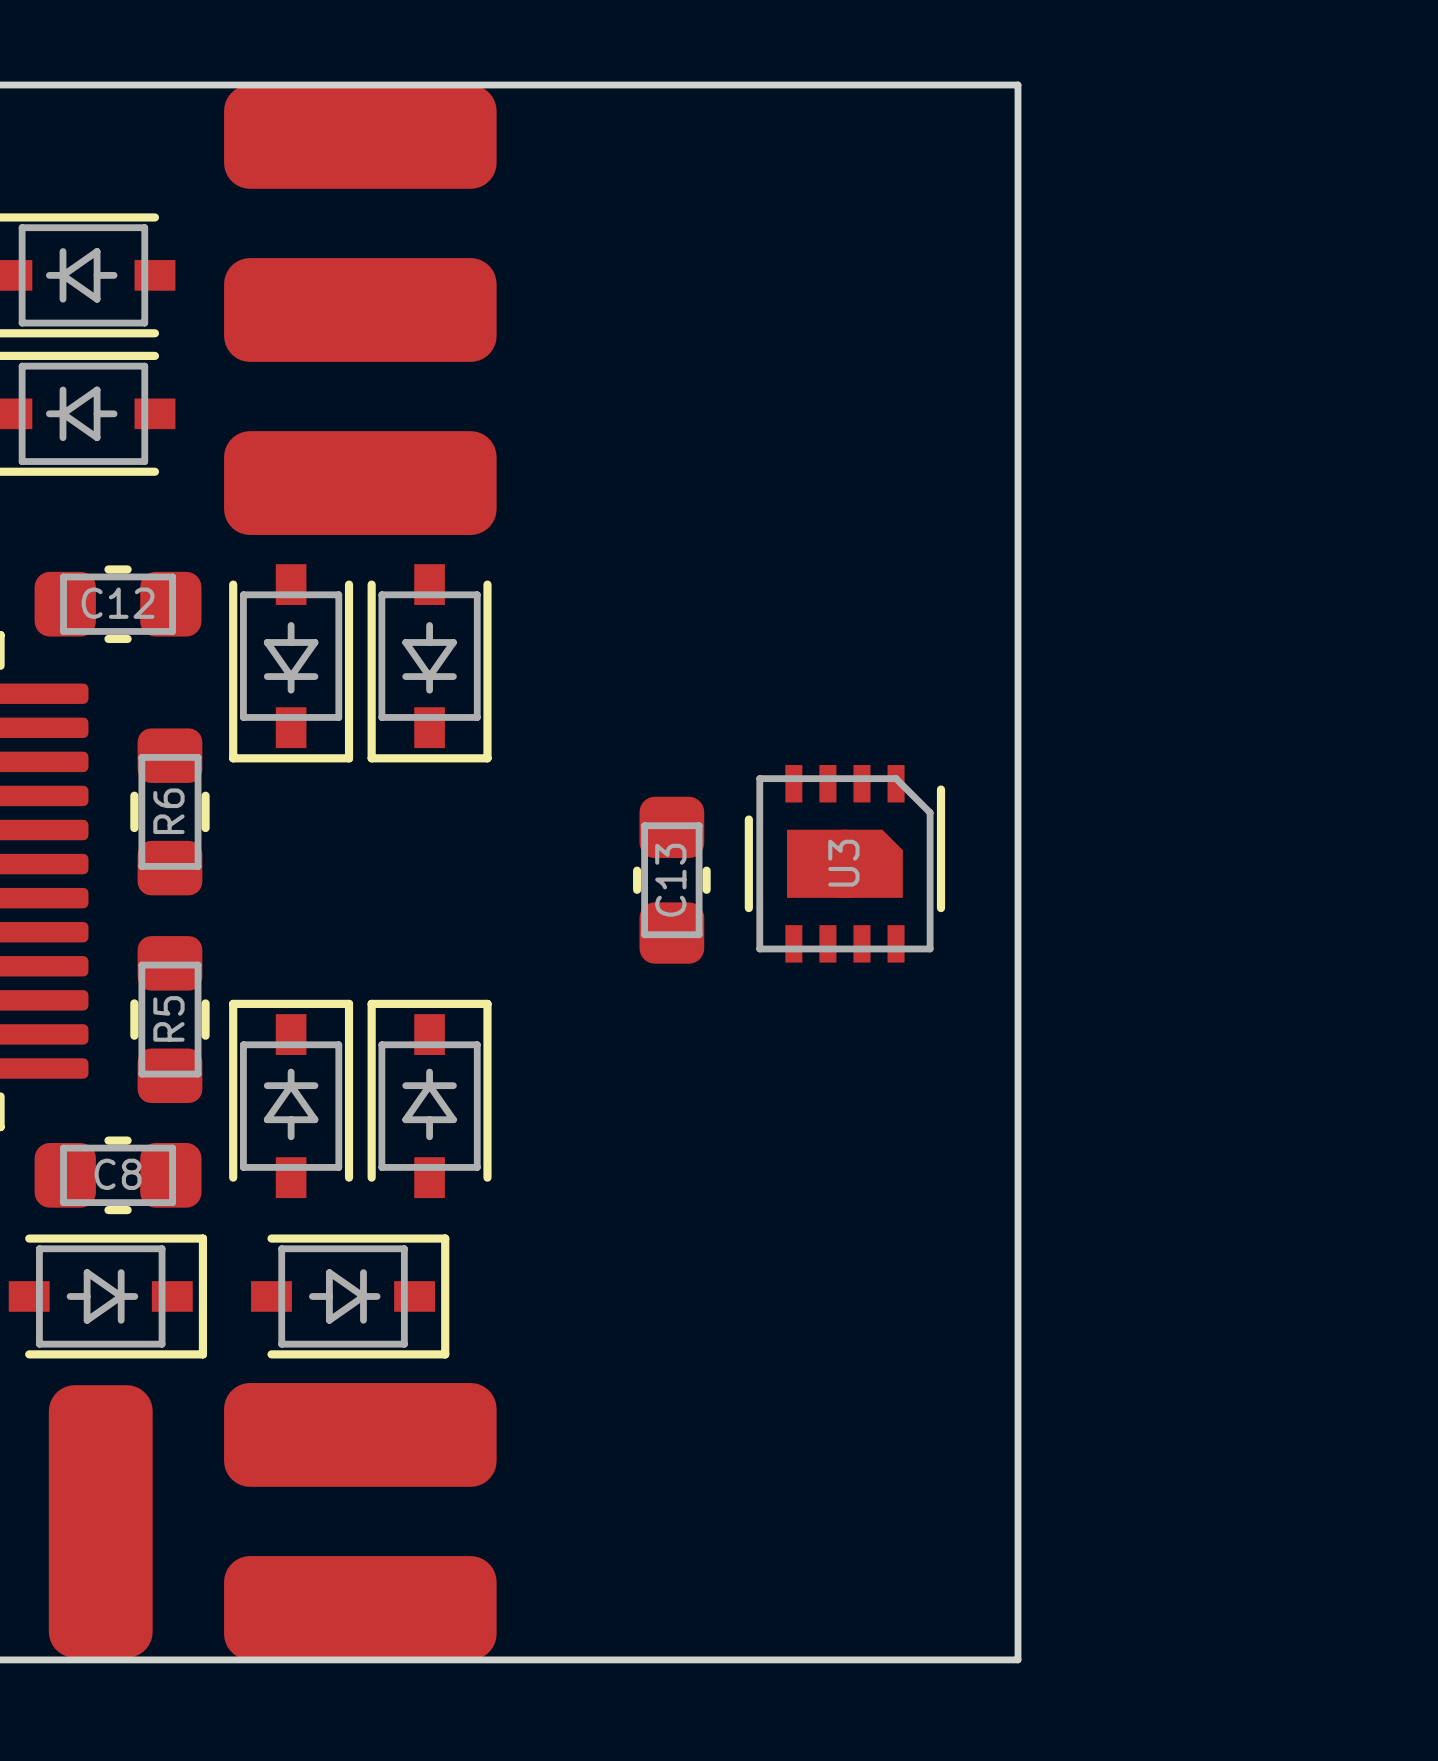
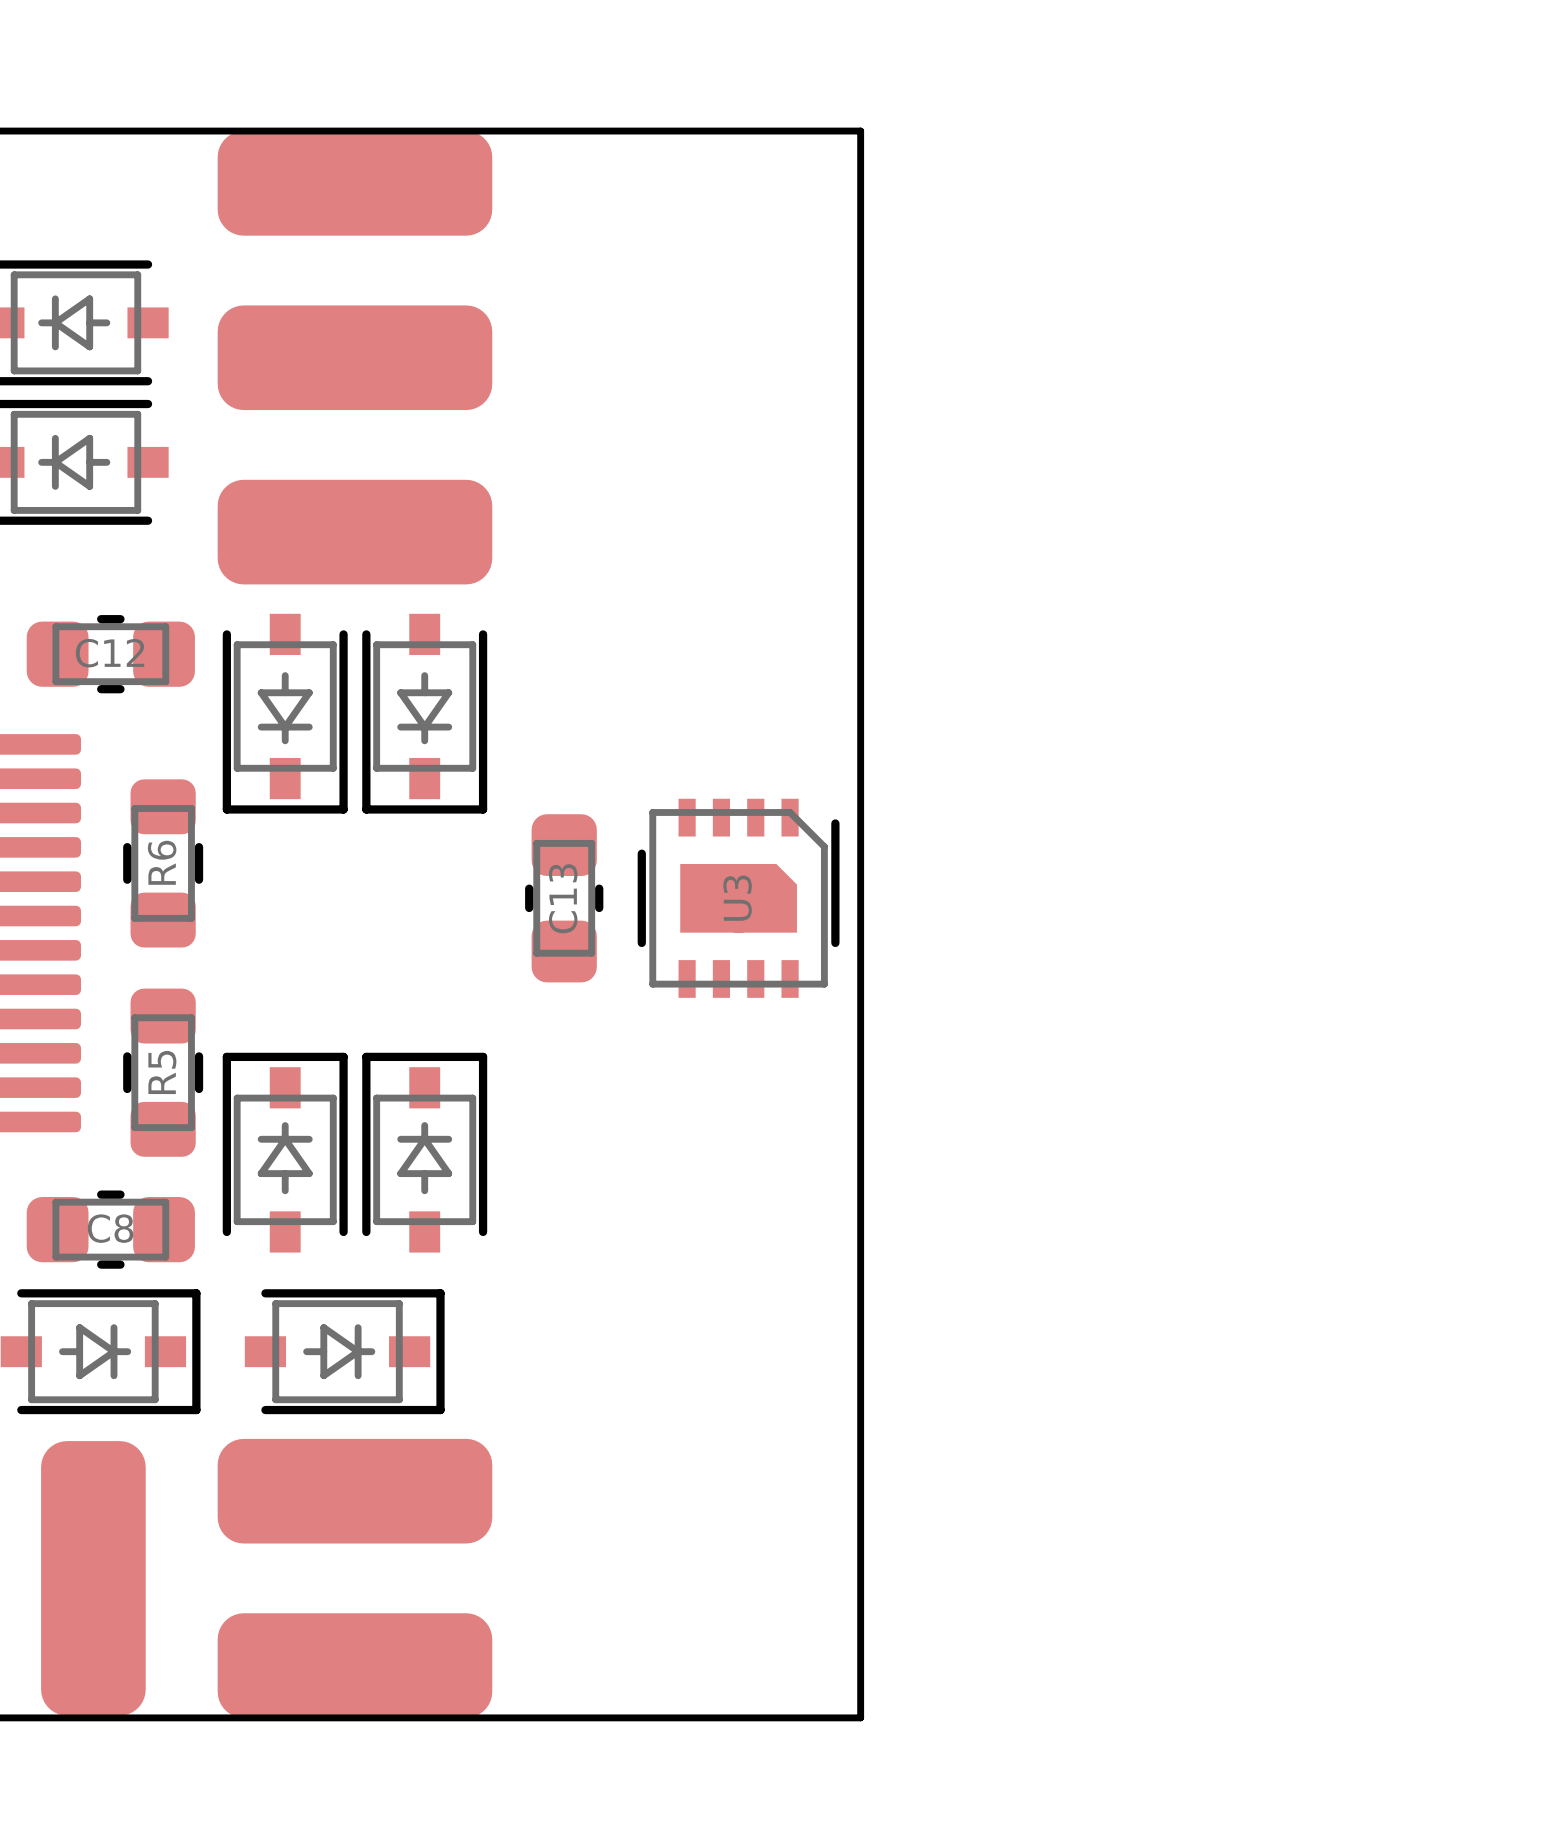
board edge: (862, 85) (1018, 85) (1018, 1659) (862, 1659) -> (860, 131) (860, 1717)
U3 position: (844, 863) -> (738, 898)
C13 position: (671, 880) -> (564, 898)

